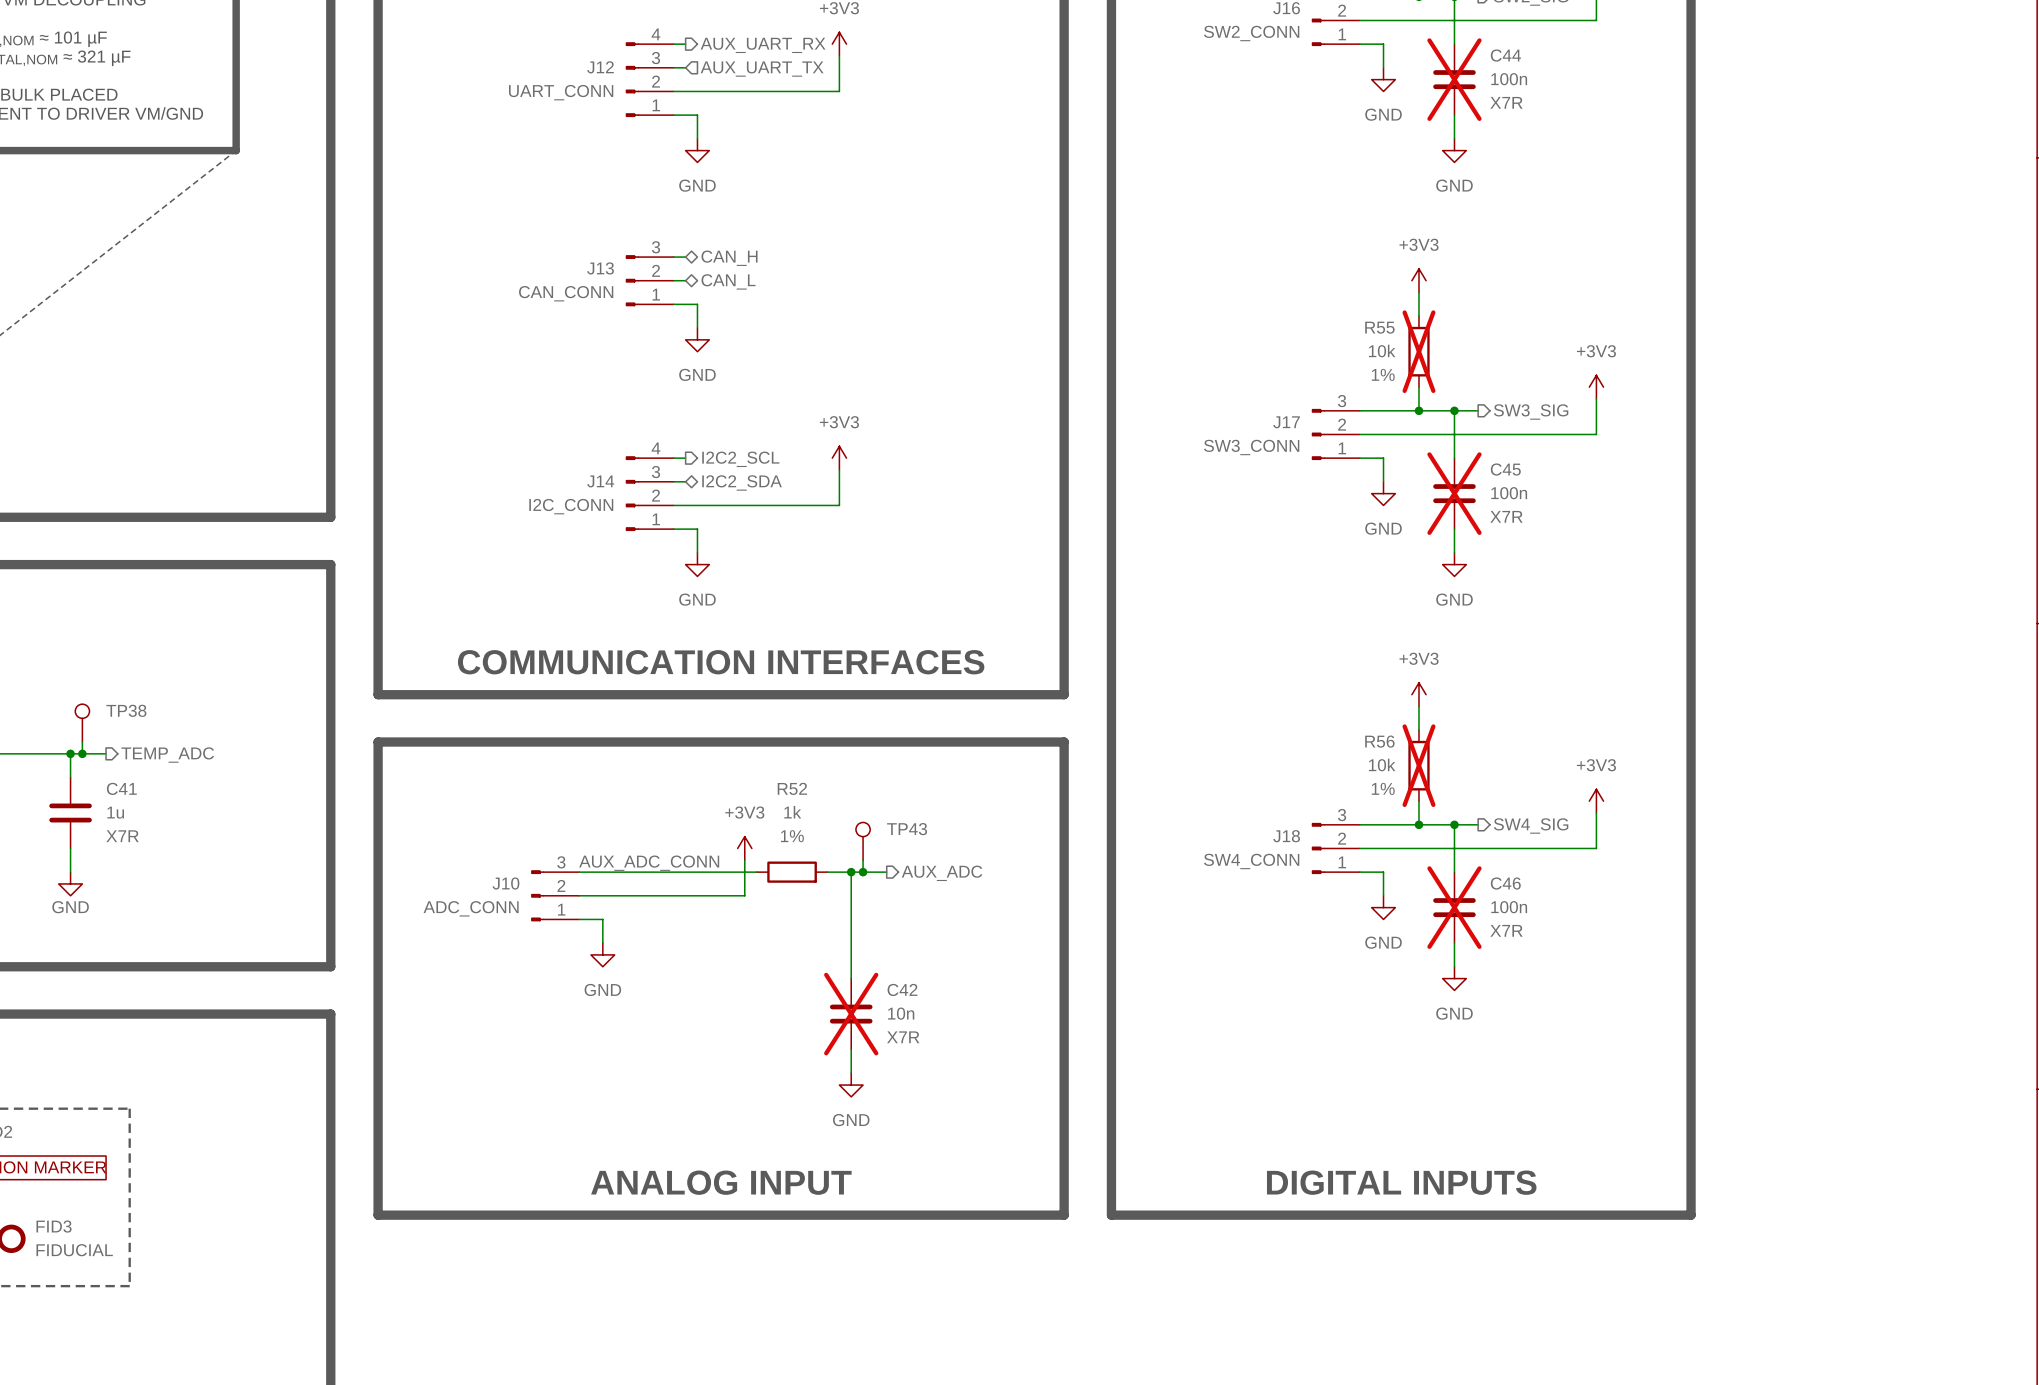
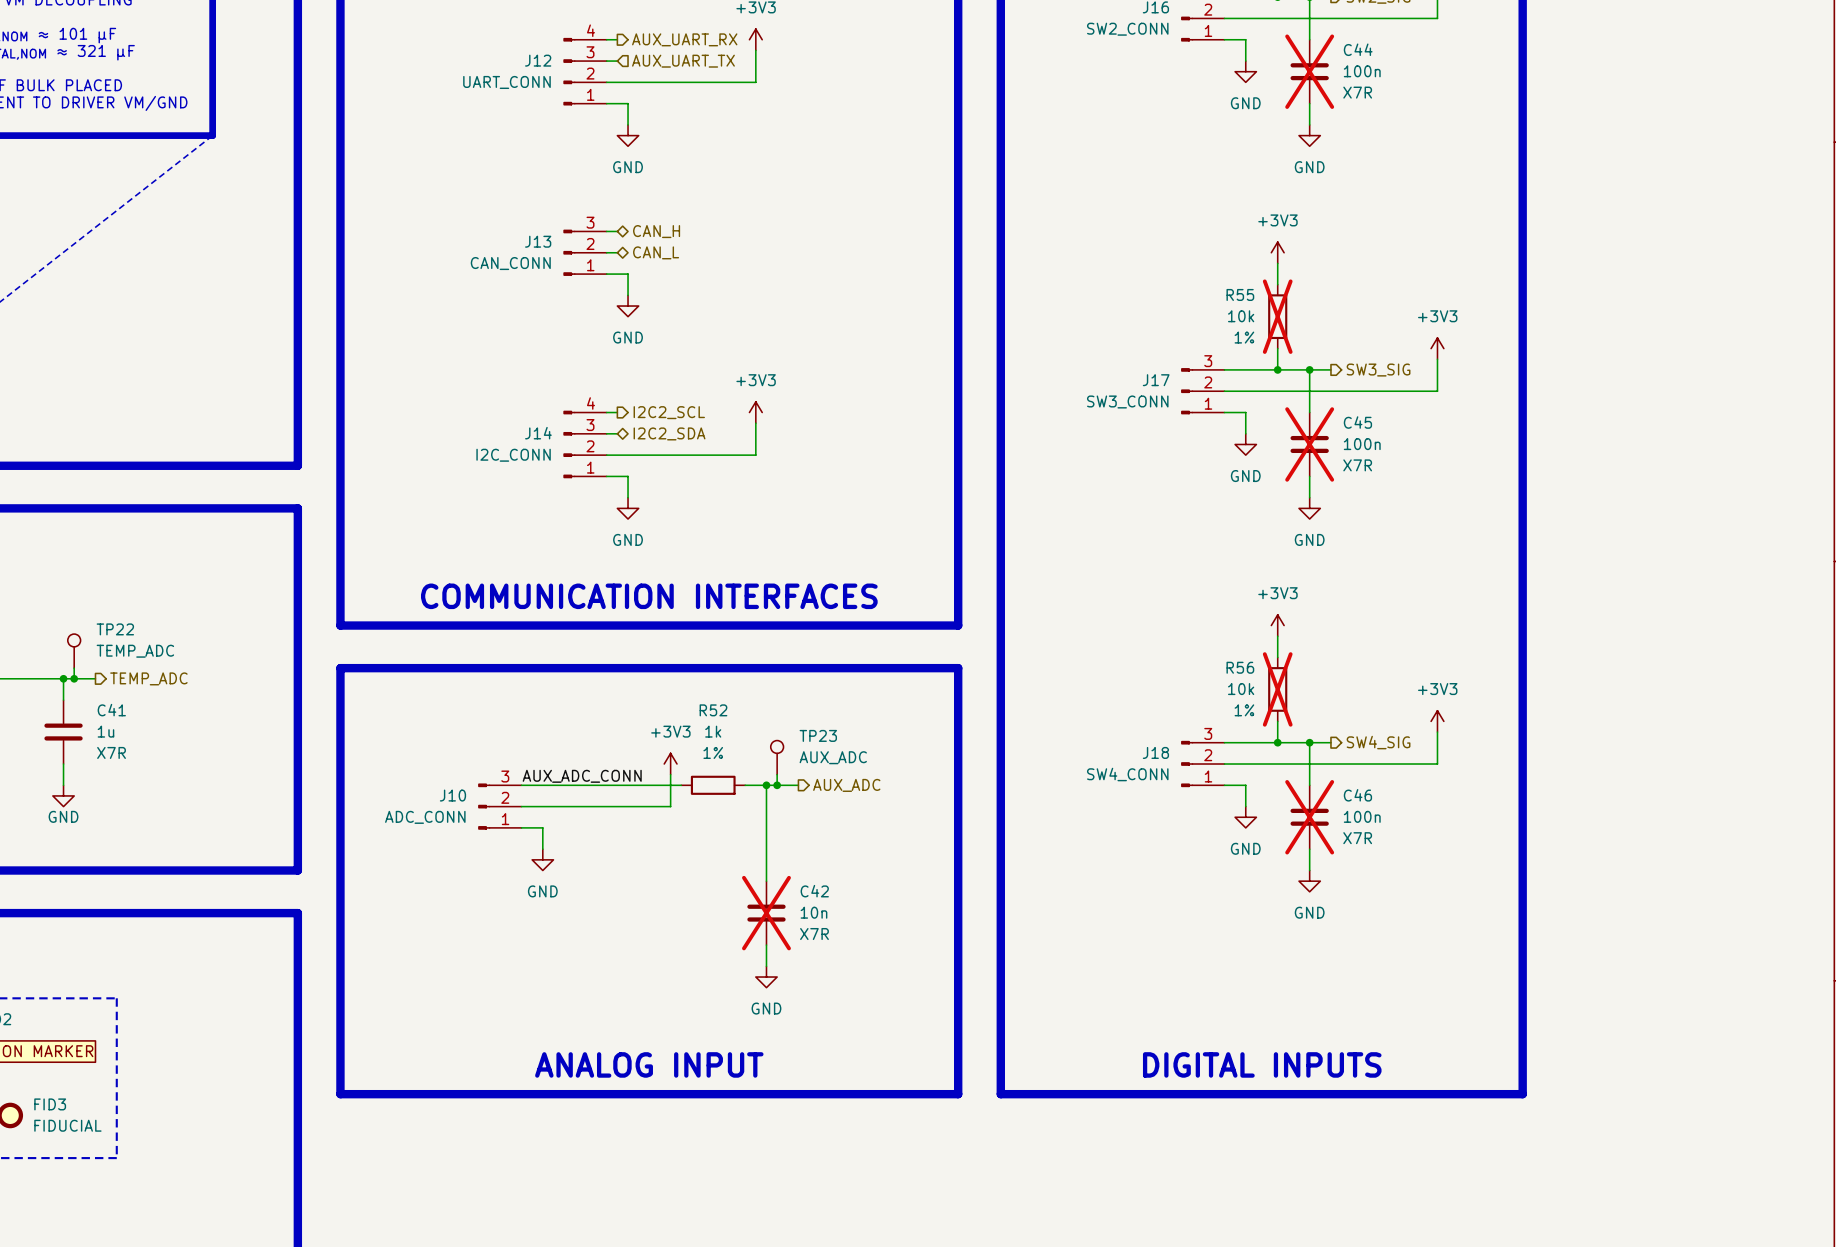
TP38 name: TP38 (126, 710) -> TP22 (115, 629)
TP38 value: none -> TEMP_ADC (135, 651)
TP43 name: TP43 (907, 829) -> TP23 (818, 735)
TP43 value: none -> AUX_ADC (833, 757)

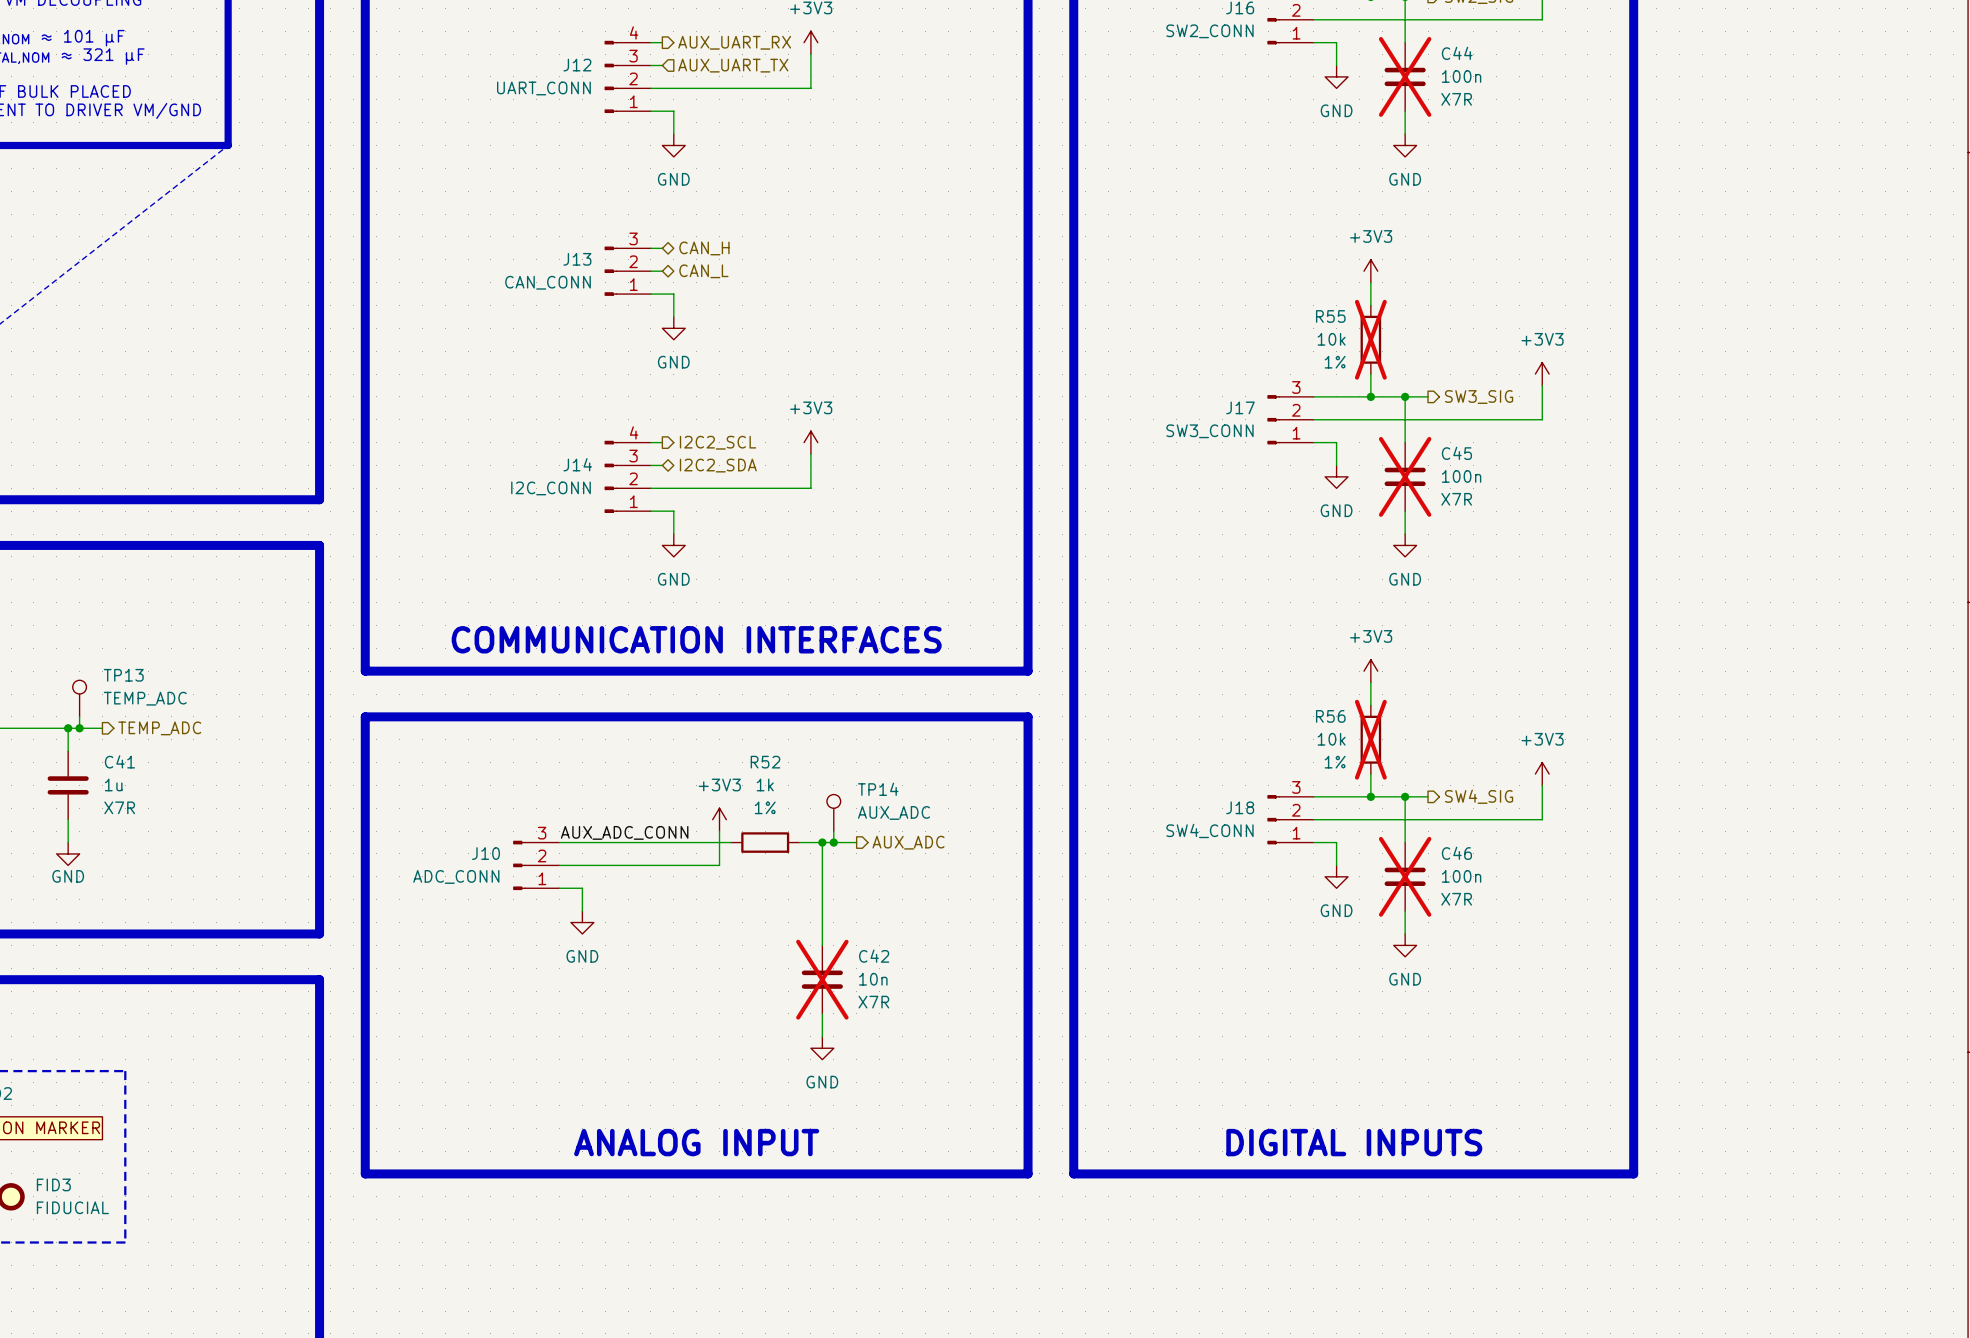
TP22 name: TP22 (115, 629) -> TP13 (123, 675)
TP23 name: TP23 (818, 735) -> TP14 (878, 789)

